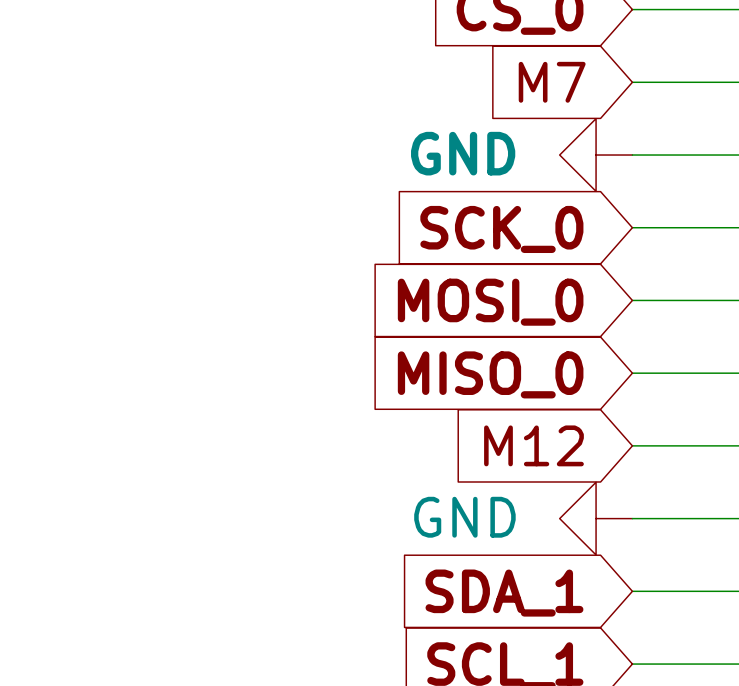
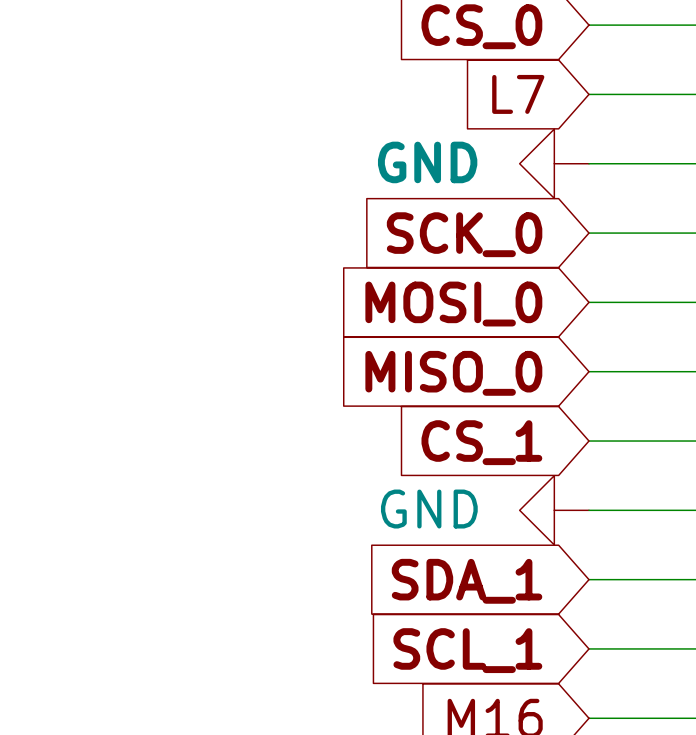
global label: M7 (552, 82) -> L7 (518, 94)
global label: M12 (533, 445) -> CS_1 (481, 442)

